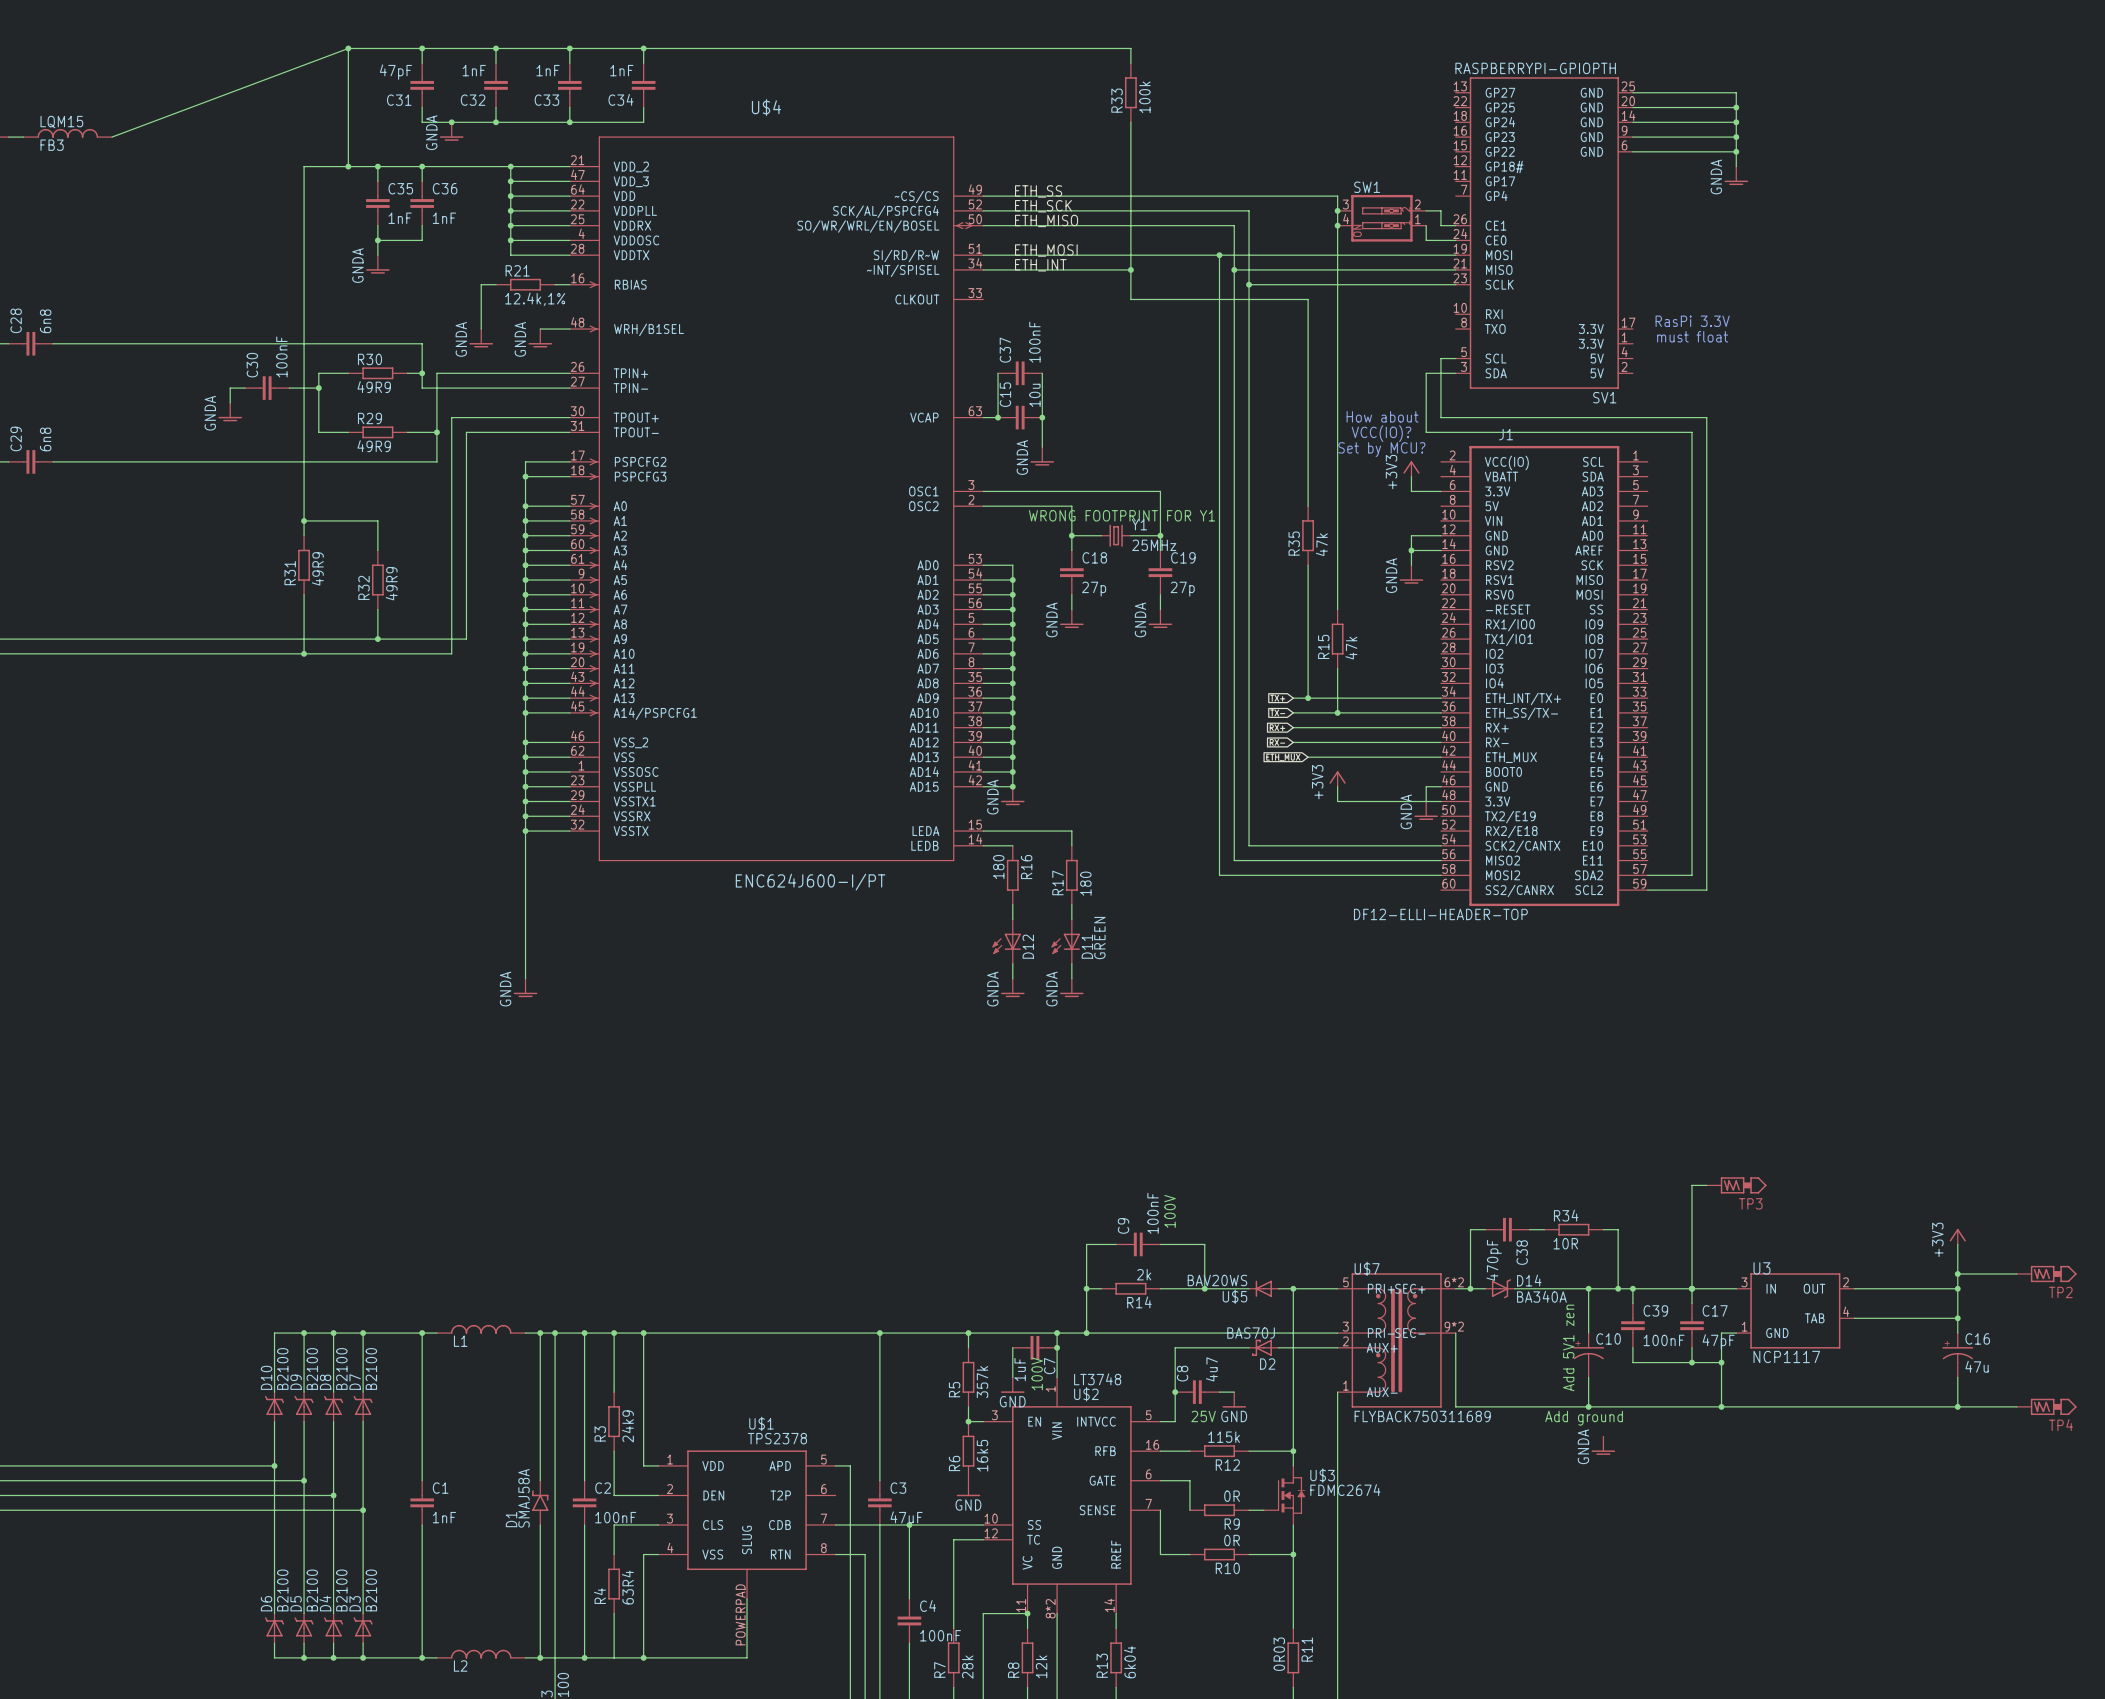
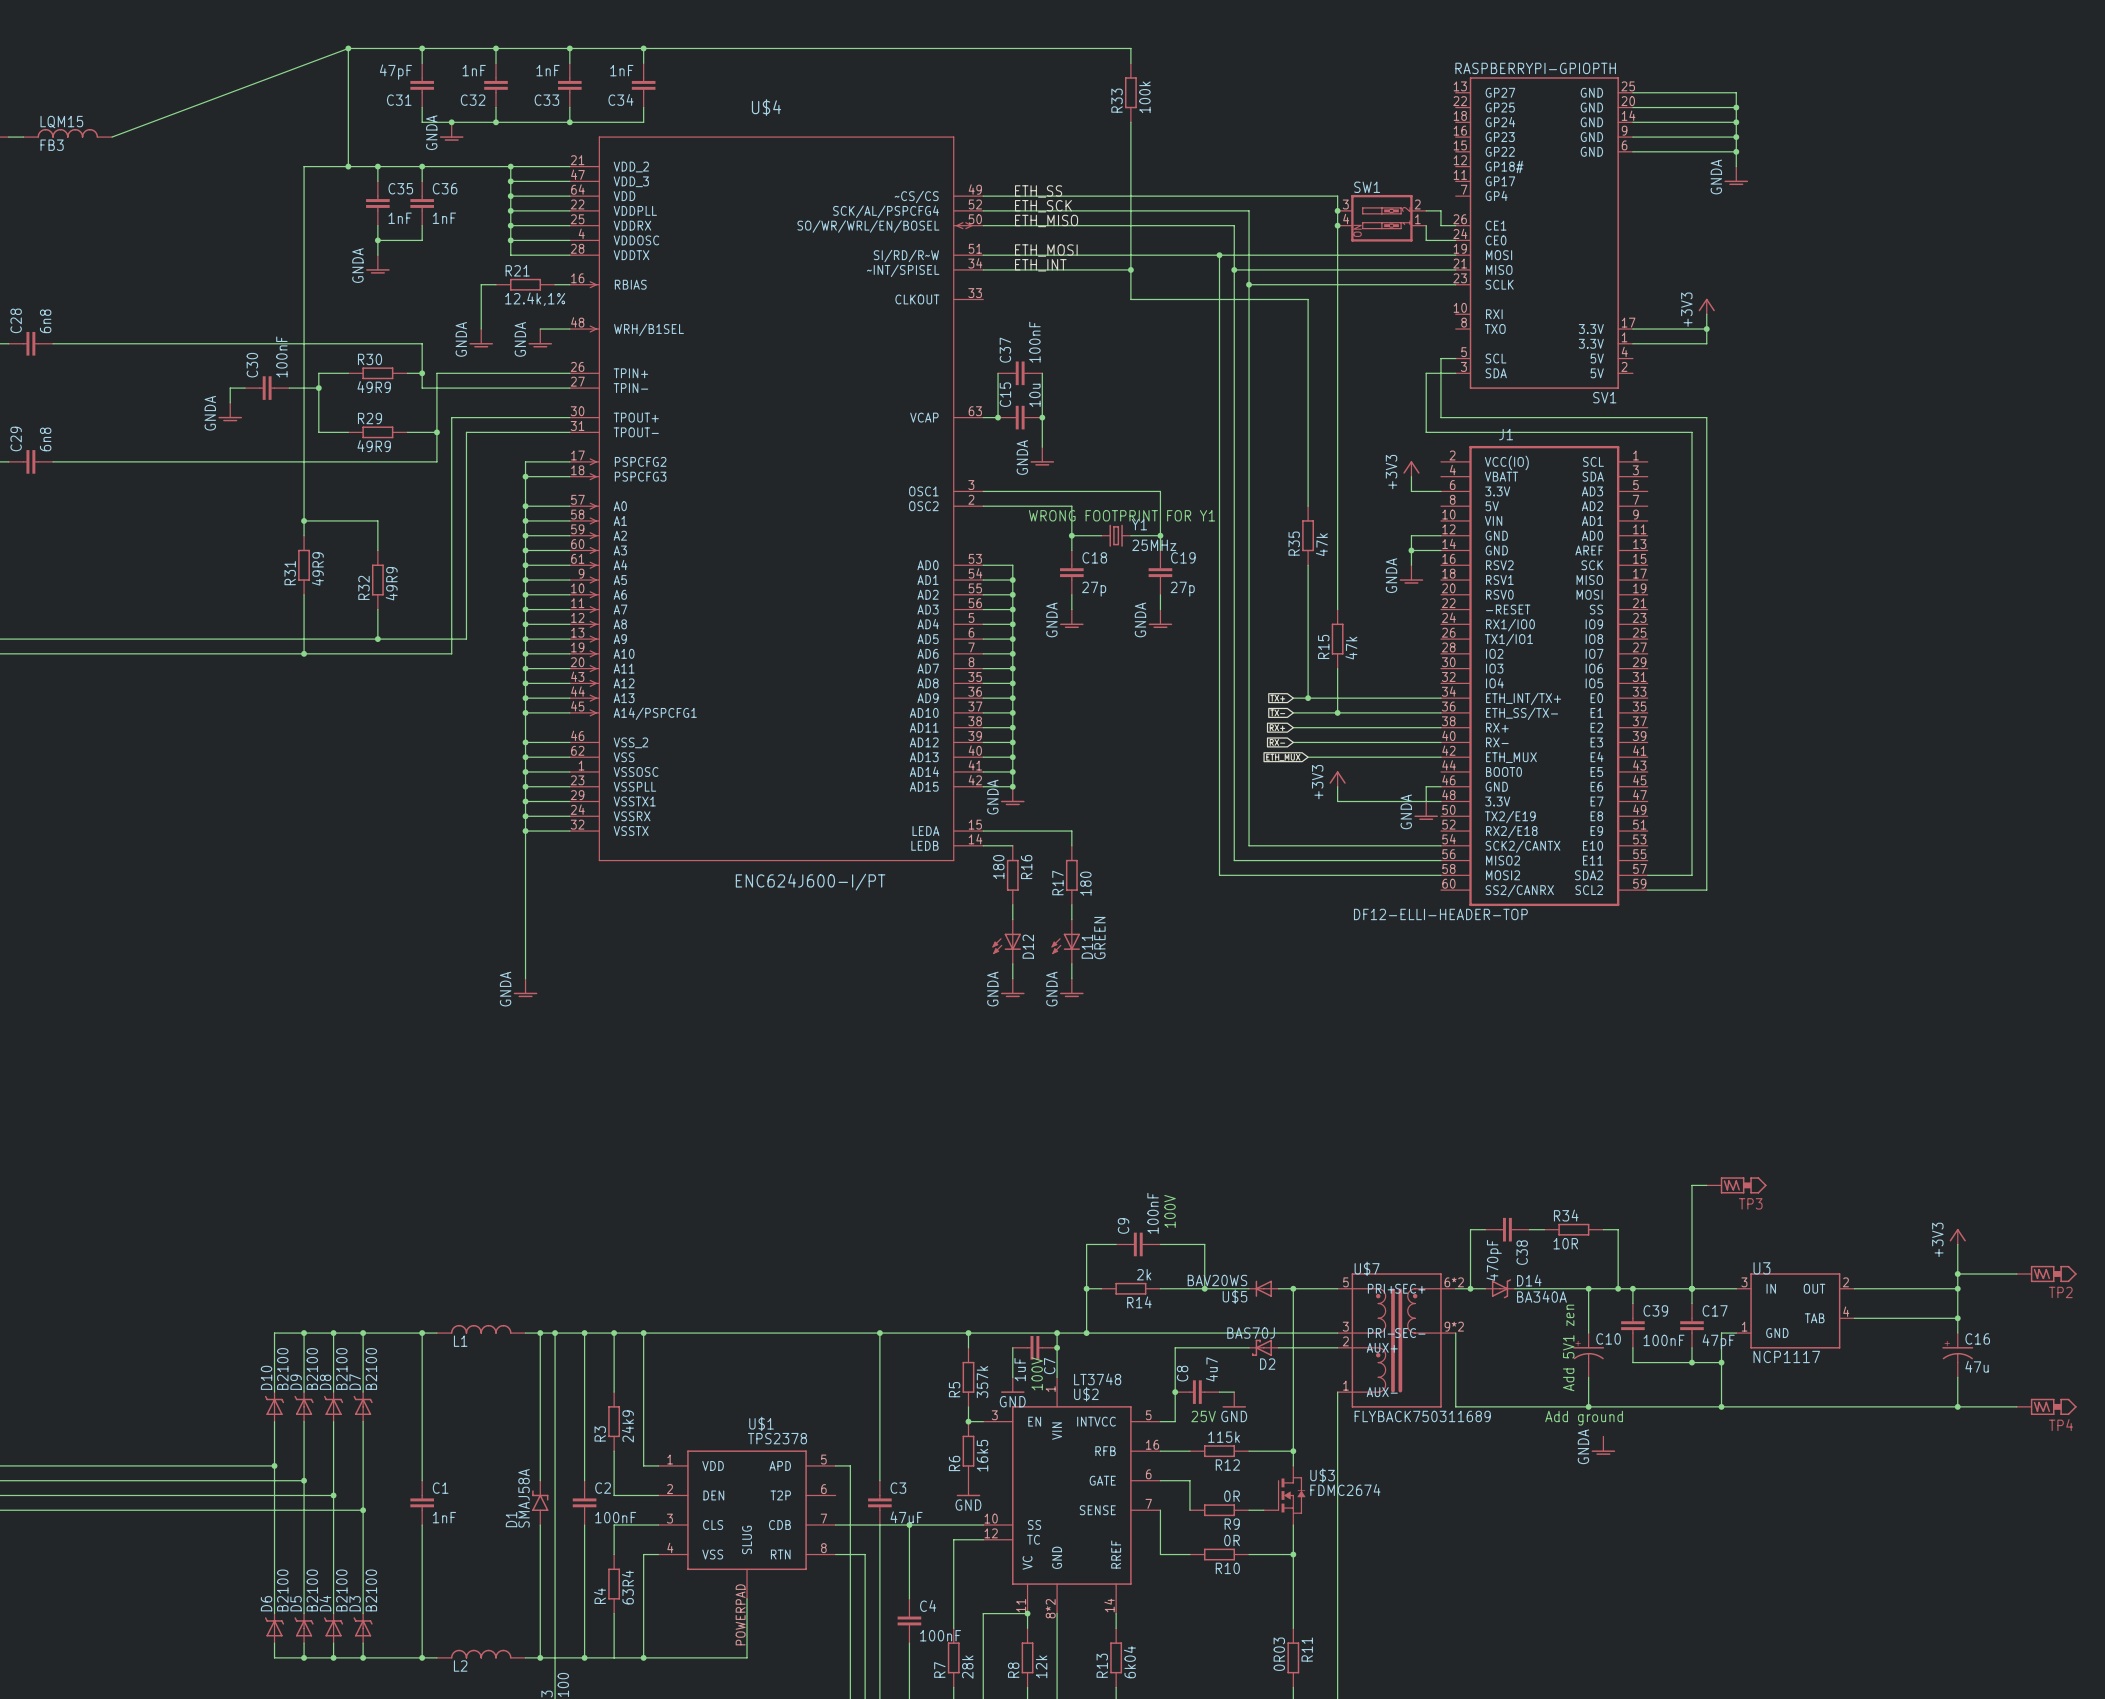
power symbol: none -> +3V3 (1706, 306)
wire: none -> (1706, 314) (1706, 343) (1632, 343)
text: RasPi 3.3V (1692, 321) -> none
wire: none -> (1632, 329) (1706, 329)
junction: none -> (1706, 329)
text: must float (1692, 336) -> none
text: How about (1382, 416) -> none
text: VCC(IO)? (1381, 433) -> none
text: Set by MCU? (1381, 449) -> none

